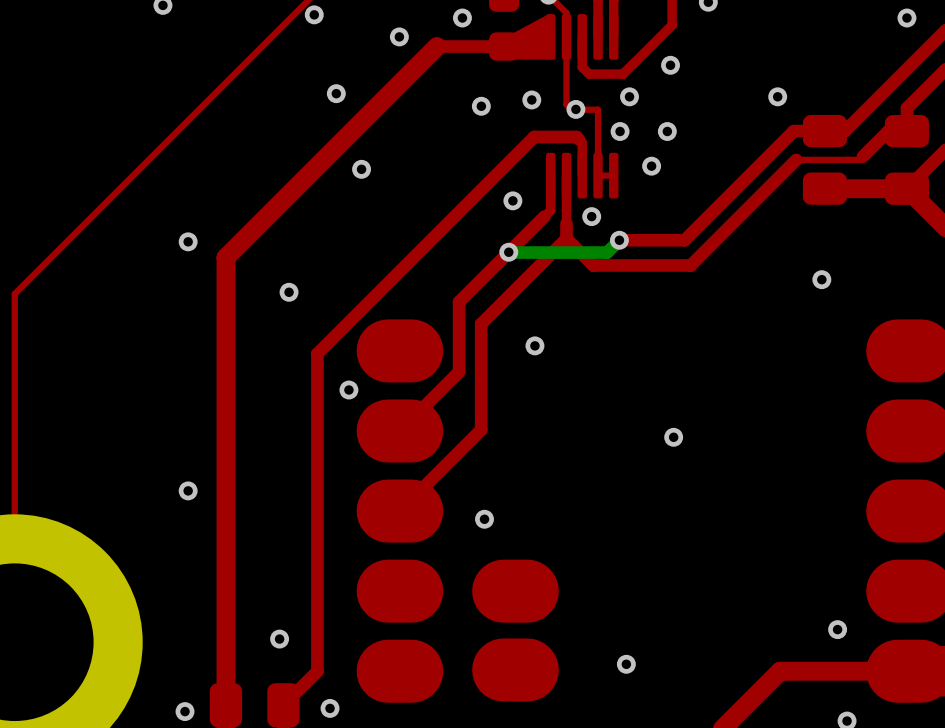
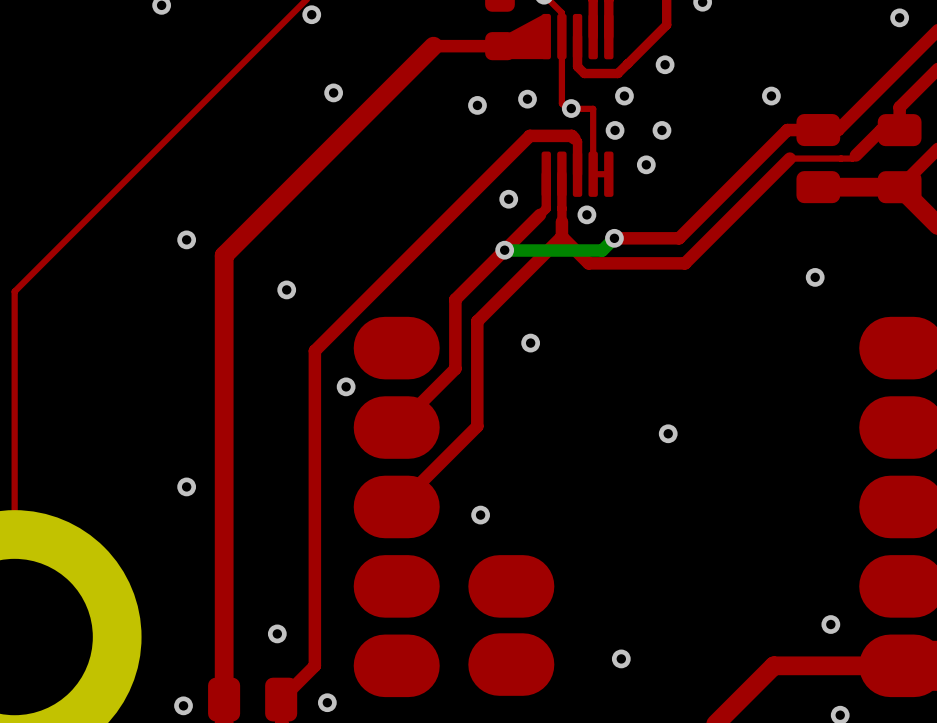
via: (462, 18) -> none
via: (399, 36) -> none
via: (361, 169) -> none

